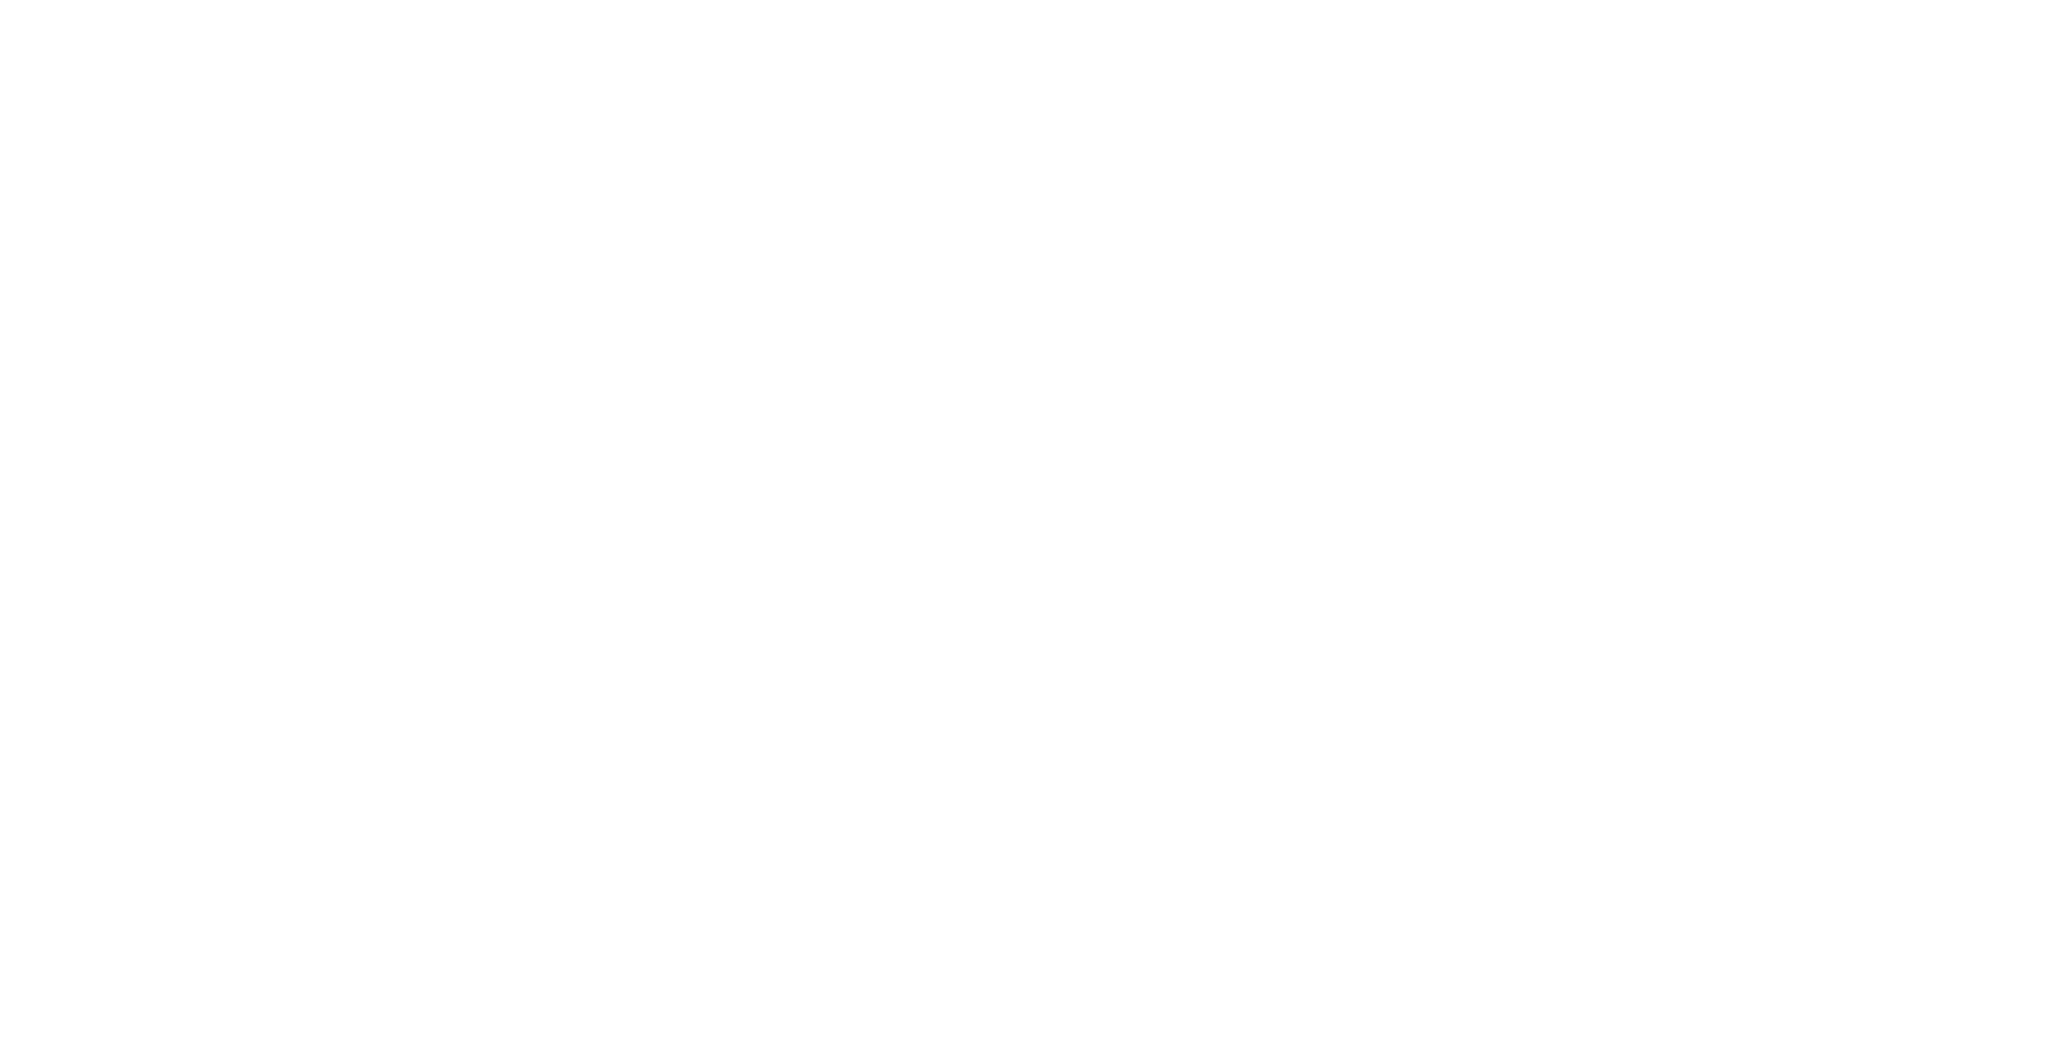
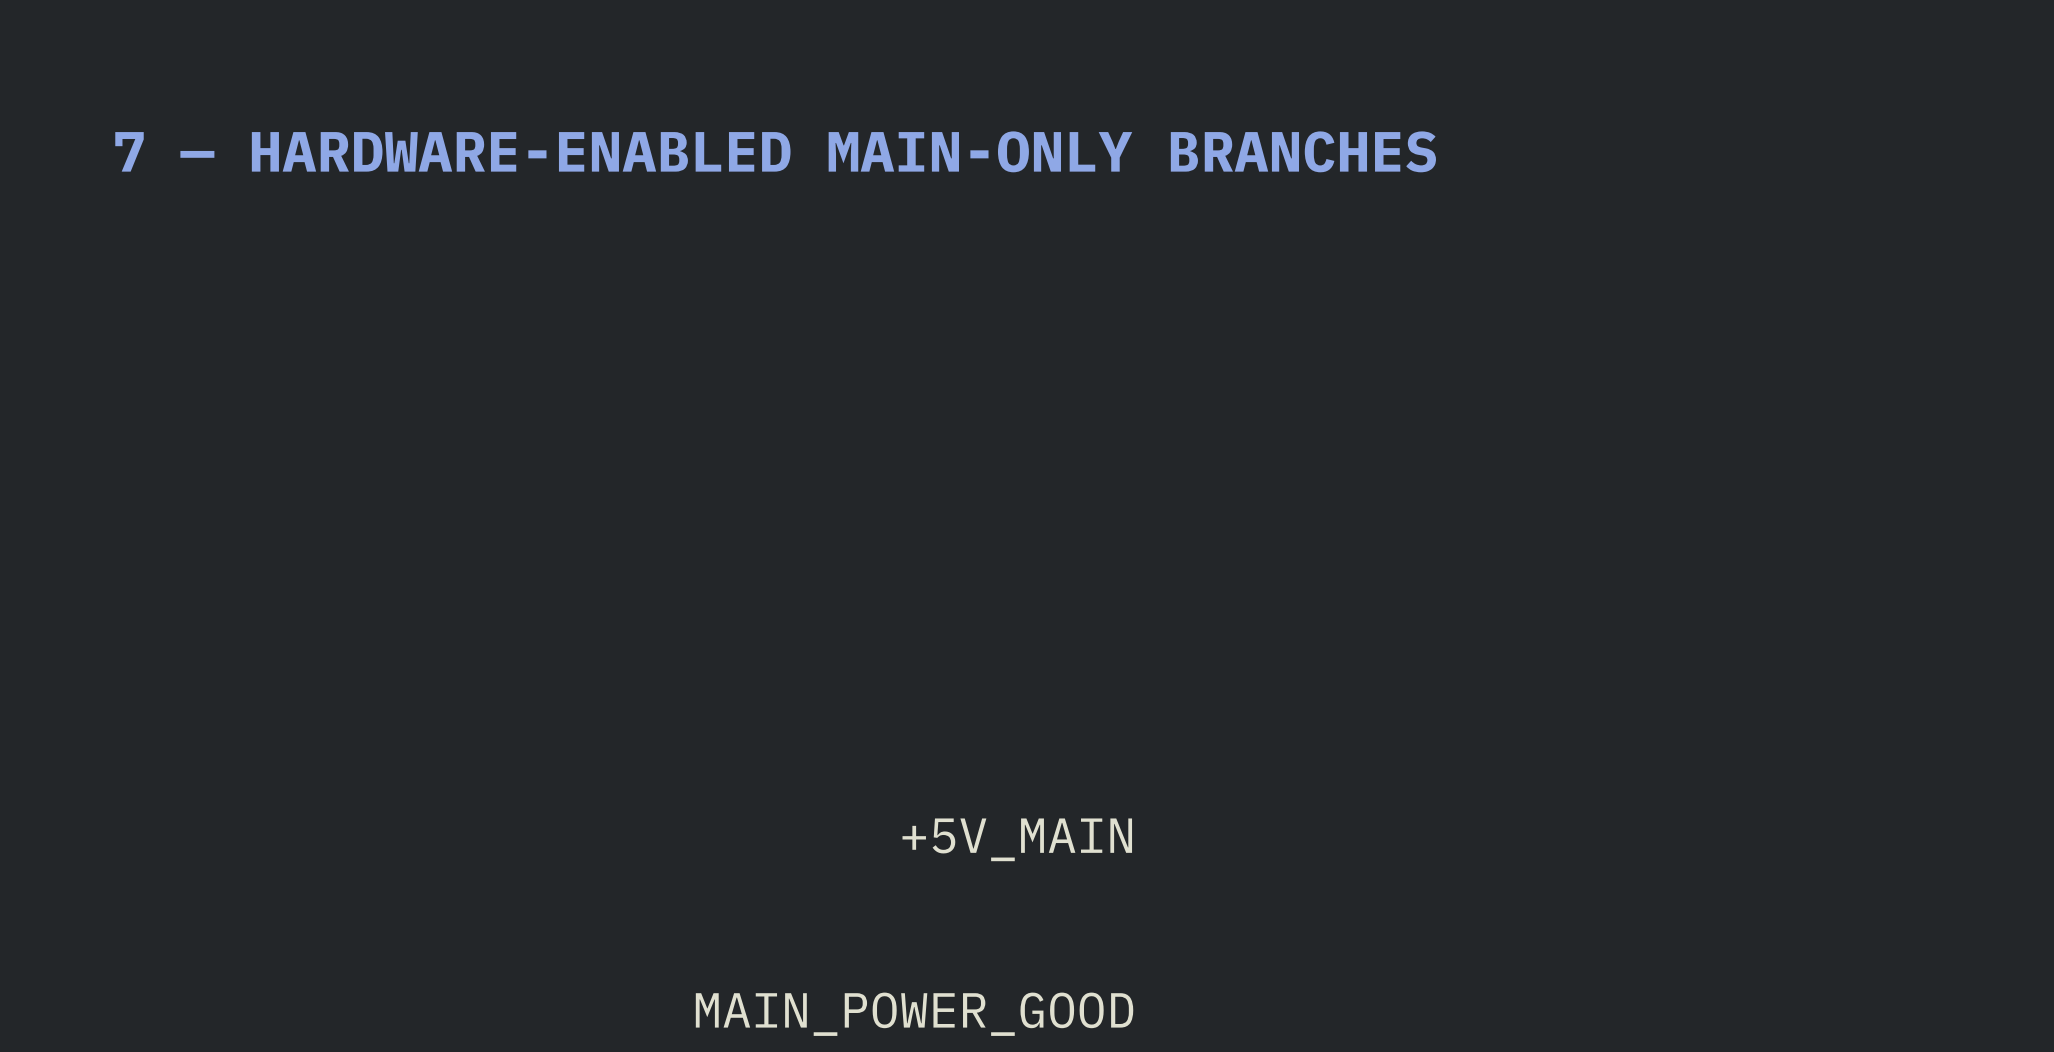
text: none -> 7 — HARDWARE-ENABLED MAIN-ONLY BRANCHES (775, 151)
label: none -> +5V_MAIN (1017, 839)
label: none -> MAIN_POWER_GOOD (914, 1014)

